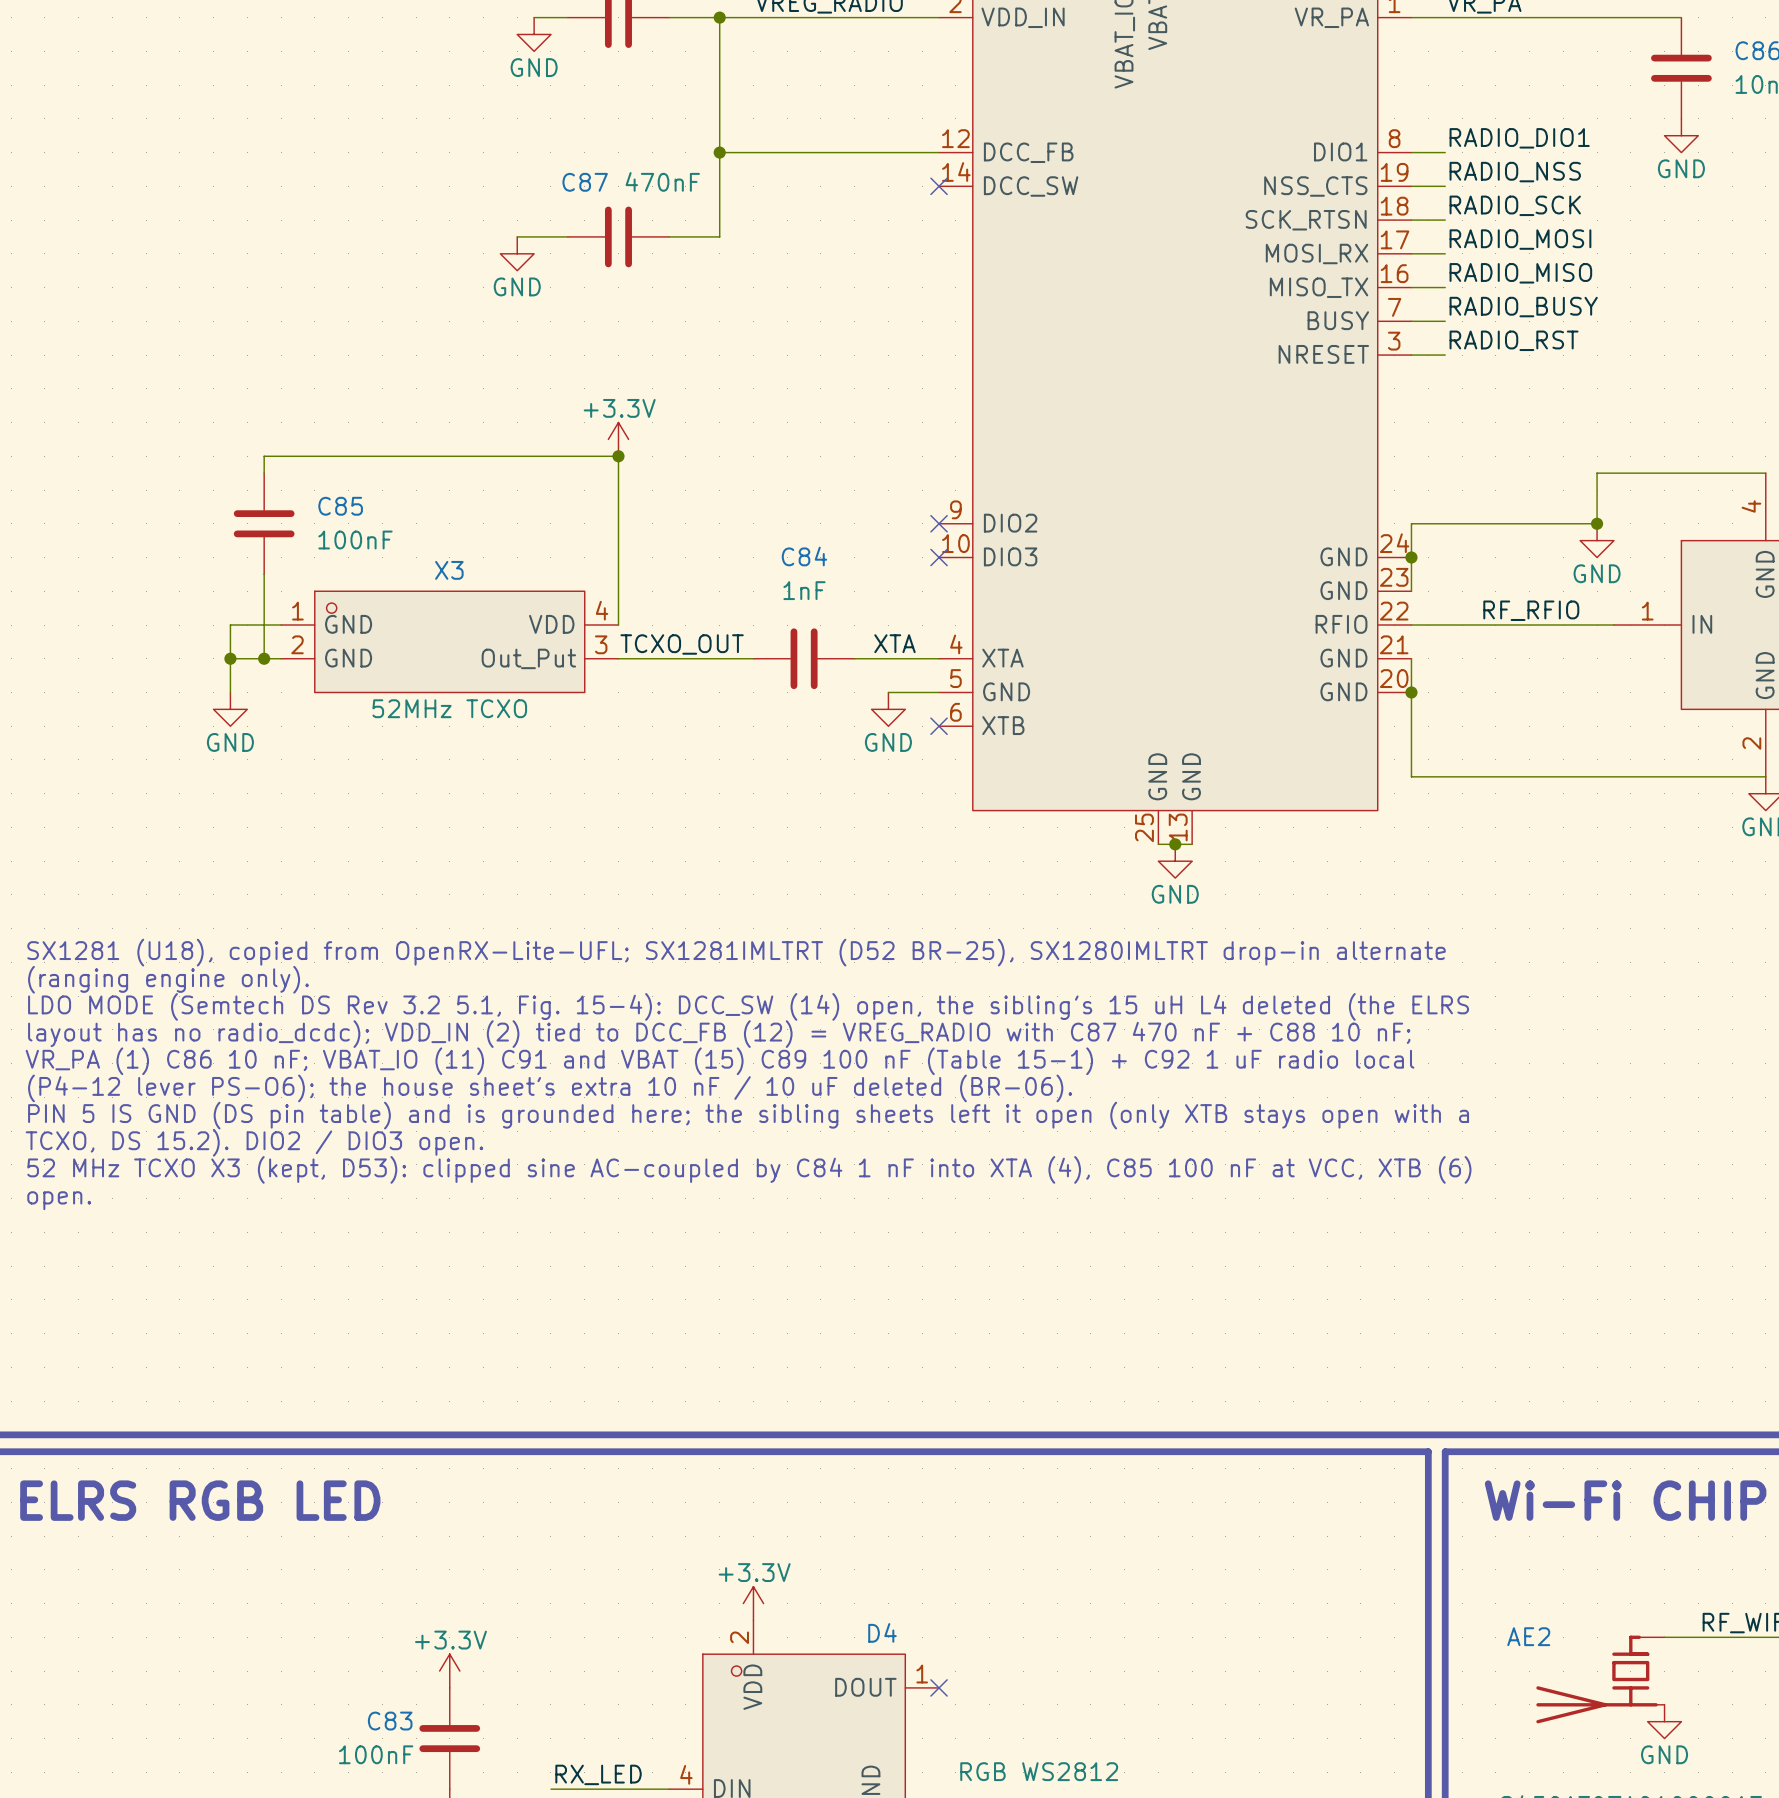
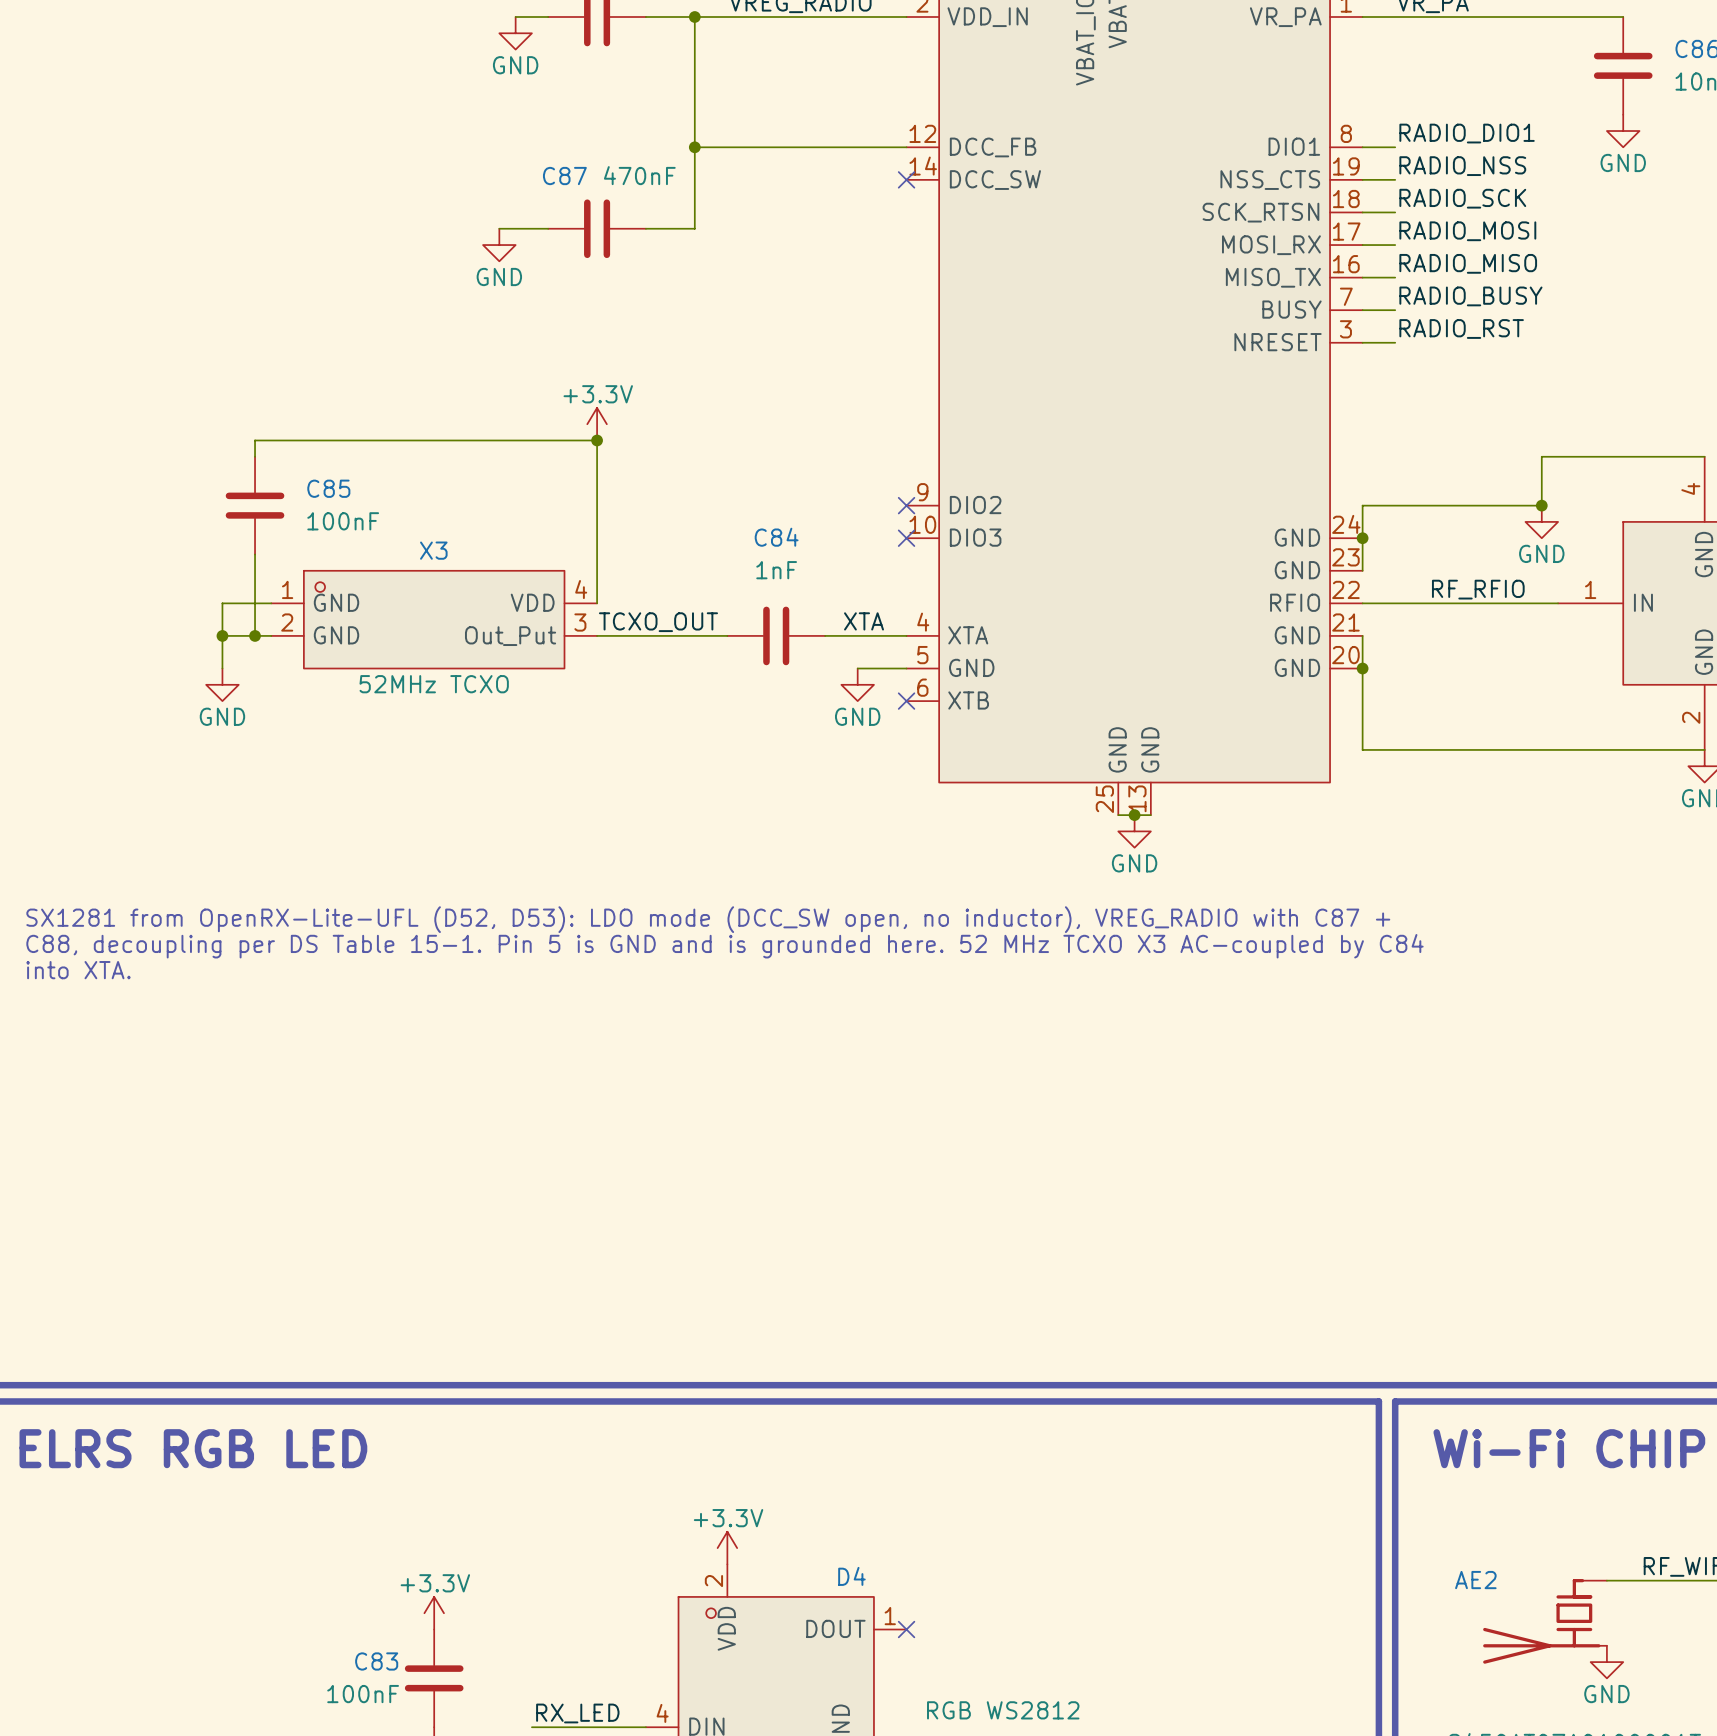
text: SX1281 (U18), copied from OpenRX-Lite-UFL; SX1281IMLTRT (D52 BR-25), SX1280IMLTRT drop-in alternate (736, 952) -> SX1281 from OpenRX-Lite-UFL (D52, D53): LDO mode (DCC_SW open, no inductor), VREG_RADIO with C87 + (708, 919)
text: (ranging engine only). (168, 979) -> C88, decoupling per DS Table 15-1. Pin 5 is GND and is grounded here. 52 MHz TCXO X3 AC-coupled by C84 (724, 946)
text: LDO MODE (Semtech DS Rev 3.2 5.1, Fig. 15-4): DCC_SW (14) open, the sibling's 15 uH L4 deleted (the ELRS (748, 1006) -> into XTA. (78, 970)
text: layout has no radio_dcdc); VDD_IN (2) tied to DCC_FB (12) = VREG_RADIO with C87 470 nF + C88 10 nF; (719, 1034) -> none
text: VR_PA (1) C86 10 nF; VBAT_IO (11) C91 and VBAT (15) C89 100 nF (Table 15-1) + C92 1 uF radio local (720, 1061) -> none
text: (P4-12 lever PS-O6); the house sheet's extra 10 nF / 10 uF deleted (BR-06). (550, 1088) -> none
text: PIN 5 IS GND (DS pin table) and is grounded here; the sibling sheets left it open (only XTB stays open with a (748, 1115) -> none
text: TCXO, DS 15.2). DIO2 / DIO3 open. (254, 1142) -> none
text: 52 MHz TCXO X3 (kept, D53): clipped sine AC-coupled by C84 1 nF into XTA (4), C85 100 nF at VCC, XTB (6) (749, 1169) -> none
text: open. (59, 1200) -> none

